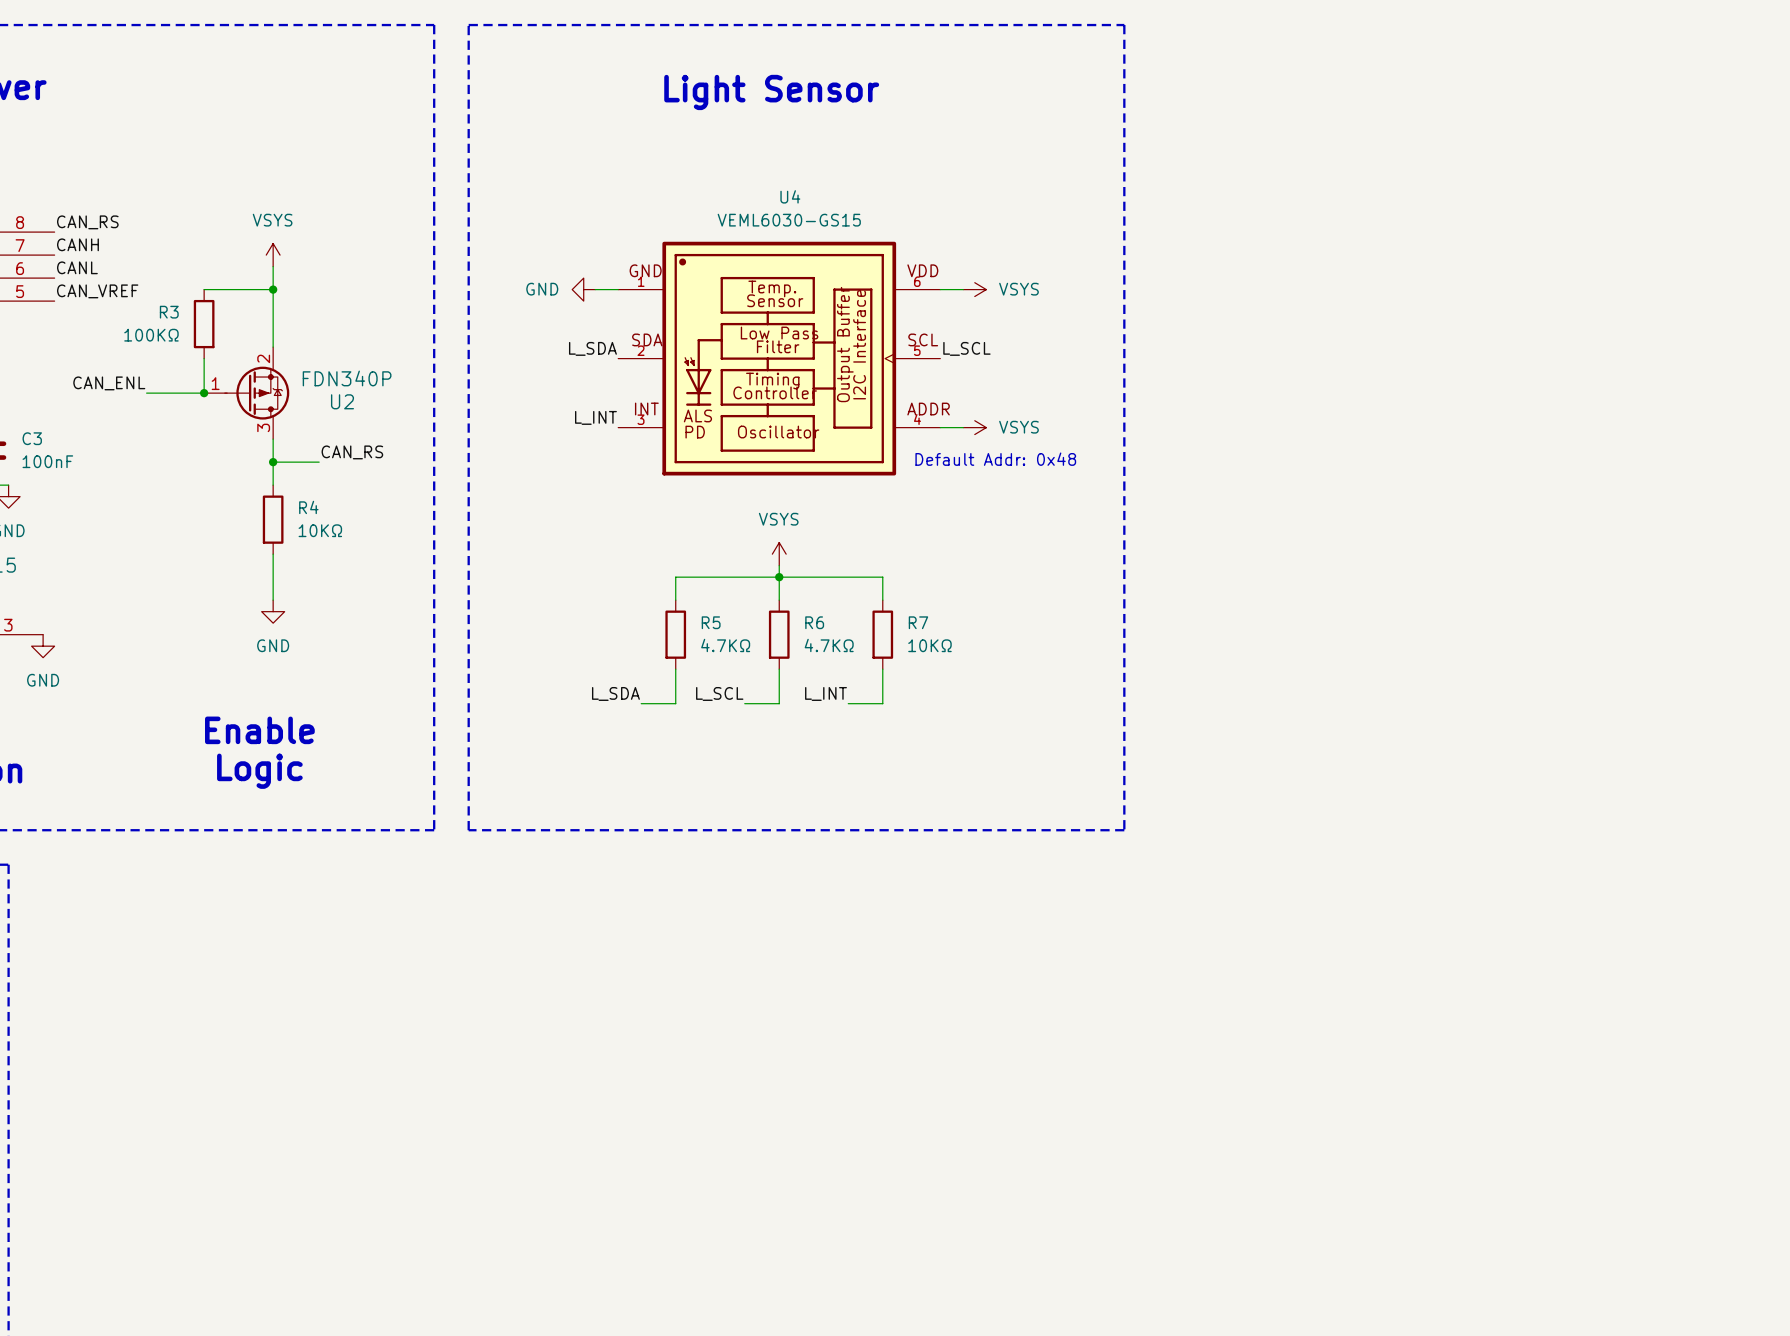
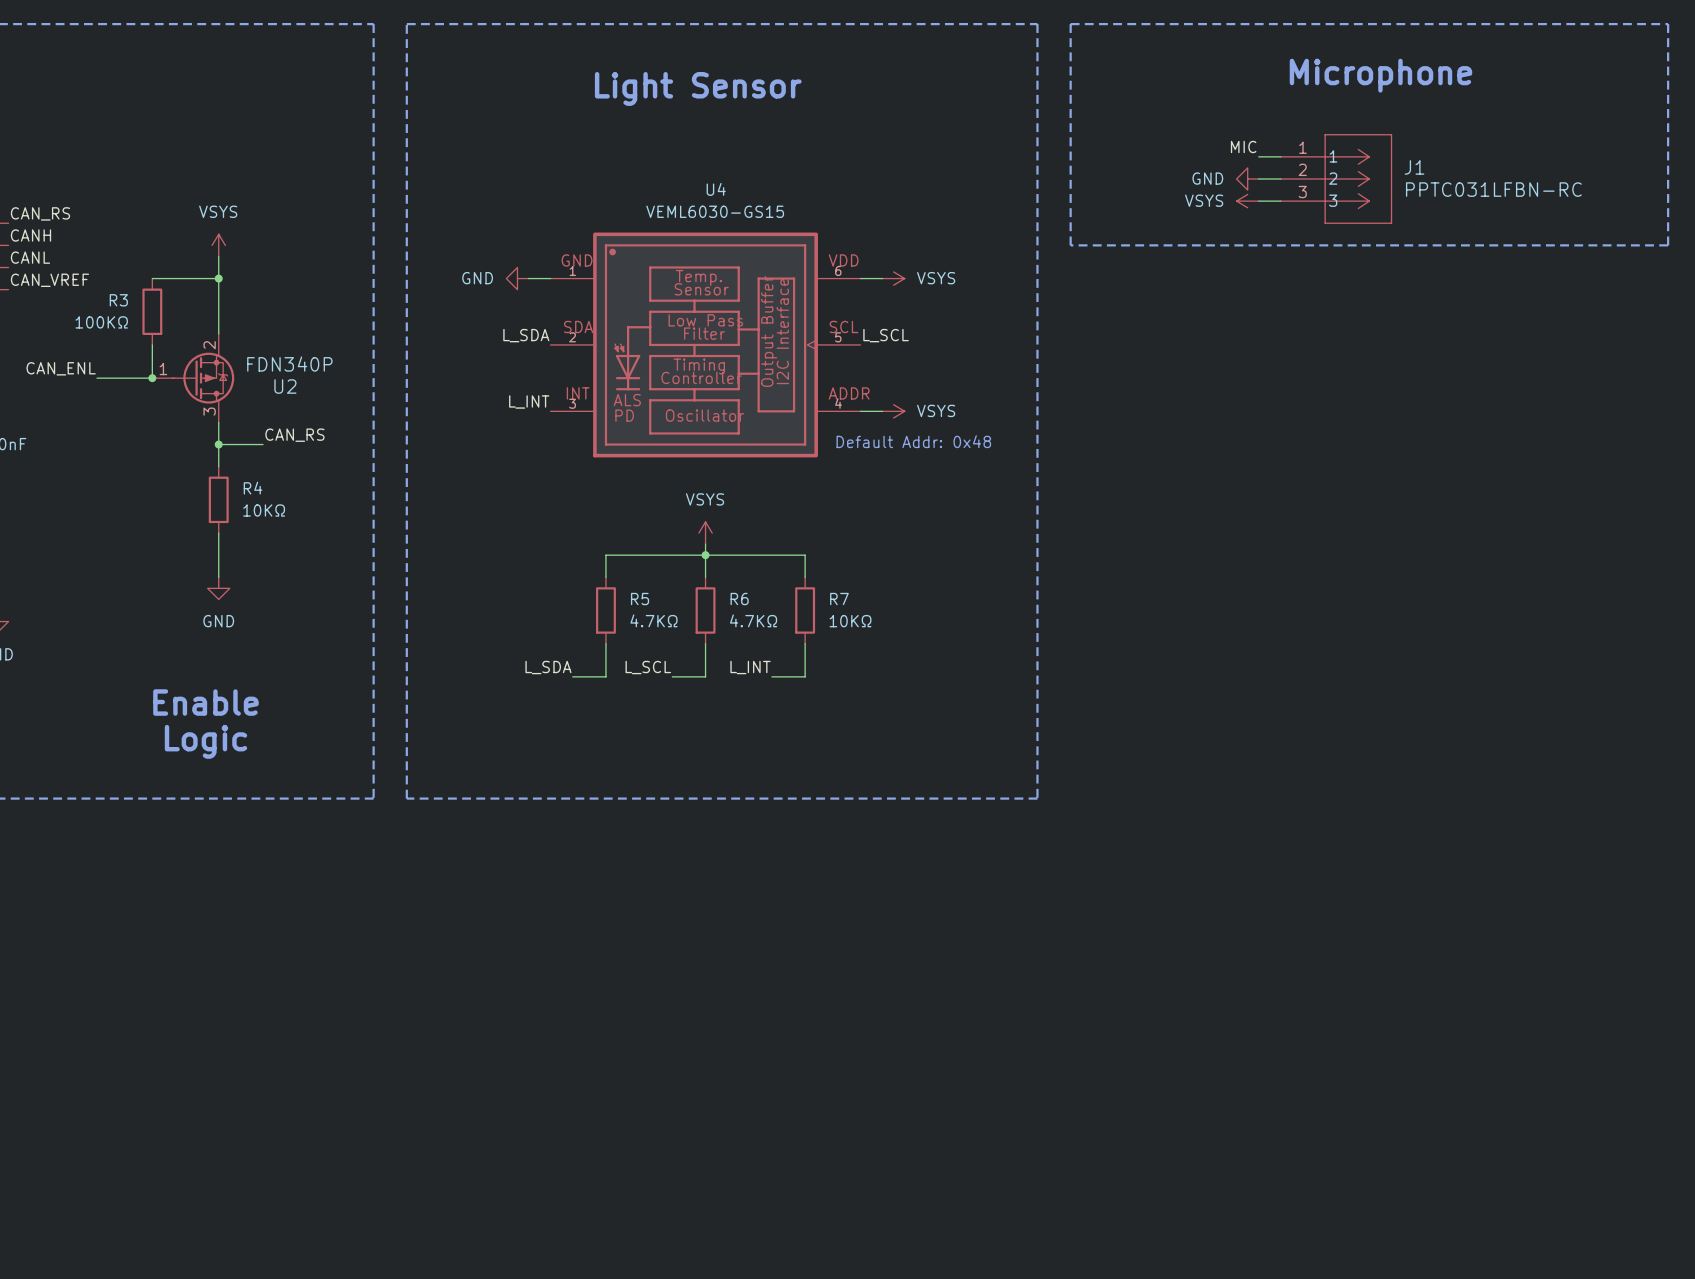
line: none -> (1070, 24) (1668, 24) (1668, 245) (1070, 245) (1070, 24)
text: none -> Microphone (1380, 75)
label: none -> MIC (1243, 146)
wire: none -> (1258, 156) (1280, 156)
power symbol: none -> GND (1247, 178)
wire: none -> (1258, 178) (1280, 178)
J1: none -> PPTC031LFBN-RC (1336, 178)
power symbol: none -> VSYS (1247, 201)
wire: none -> (1258, 201) (1280, 201)

